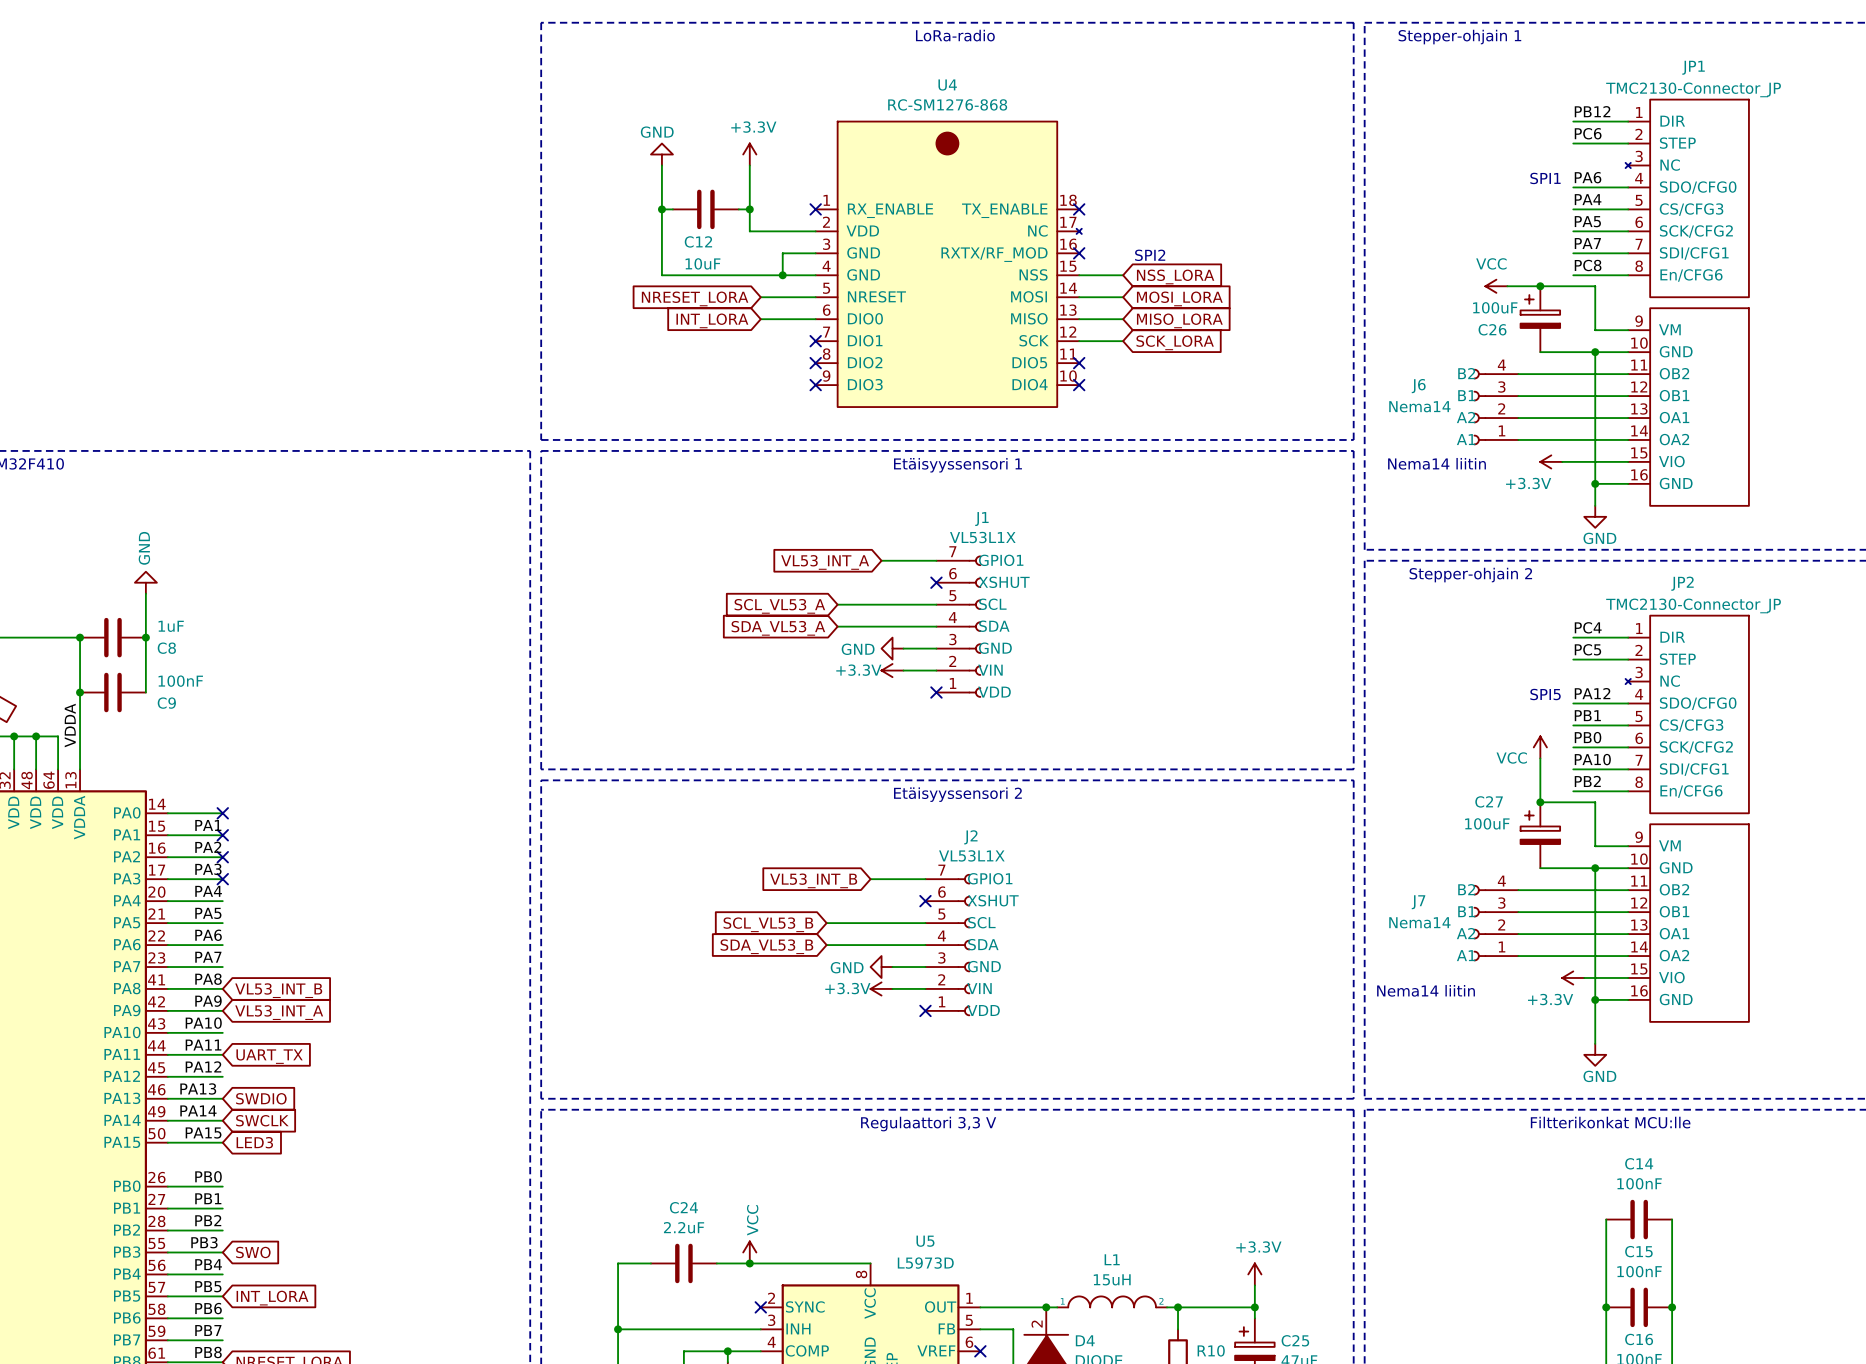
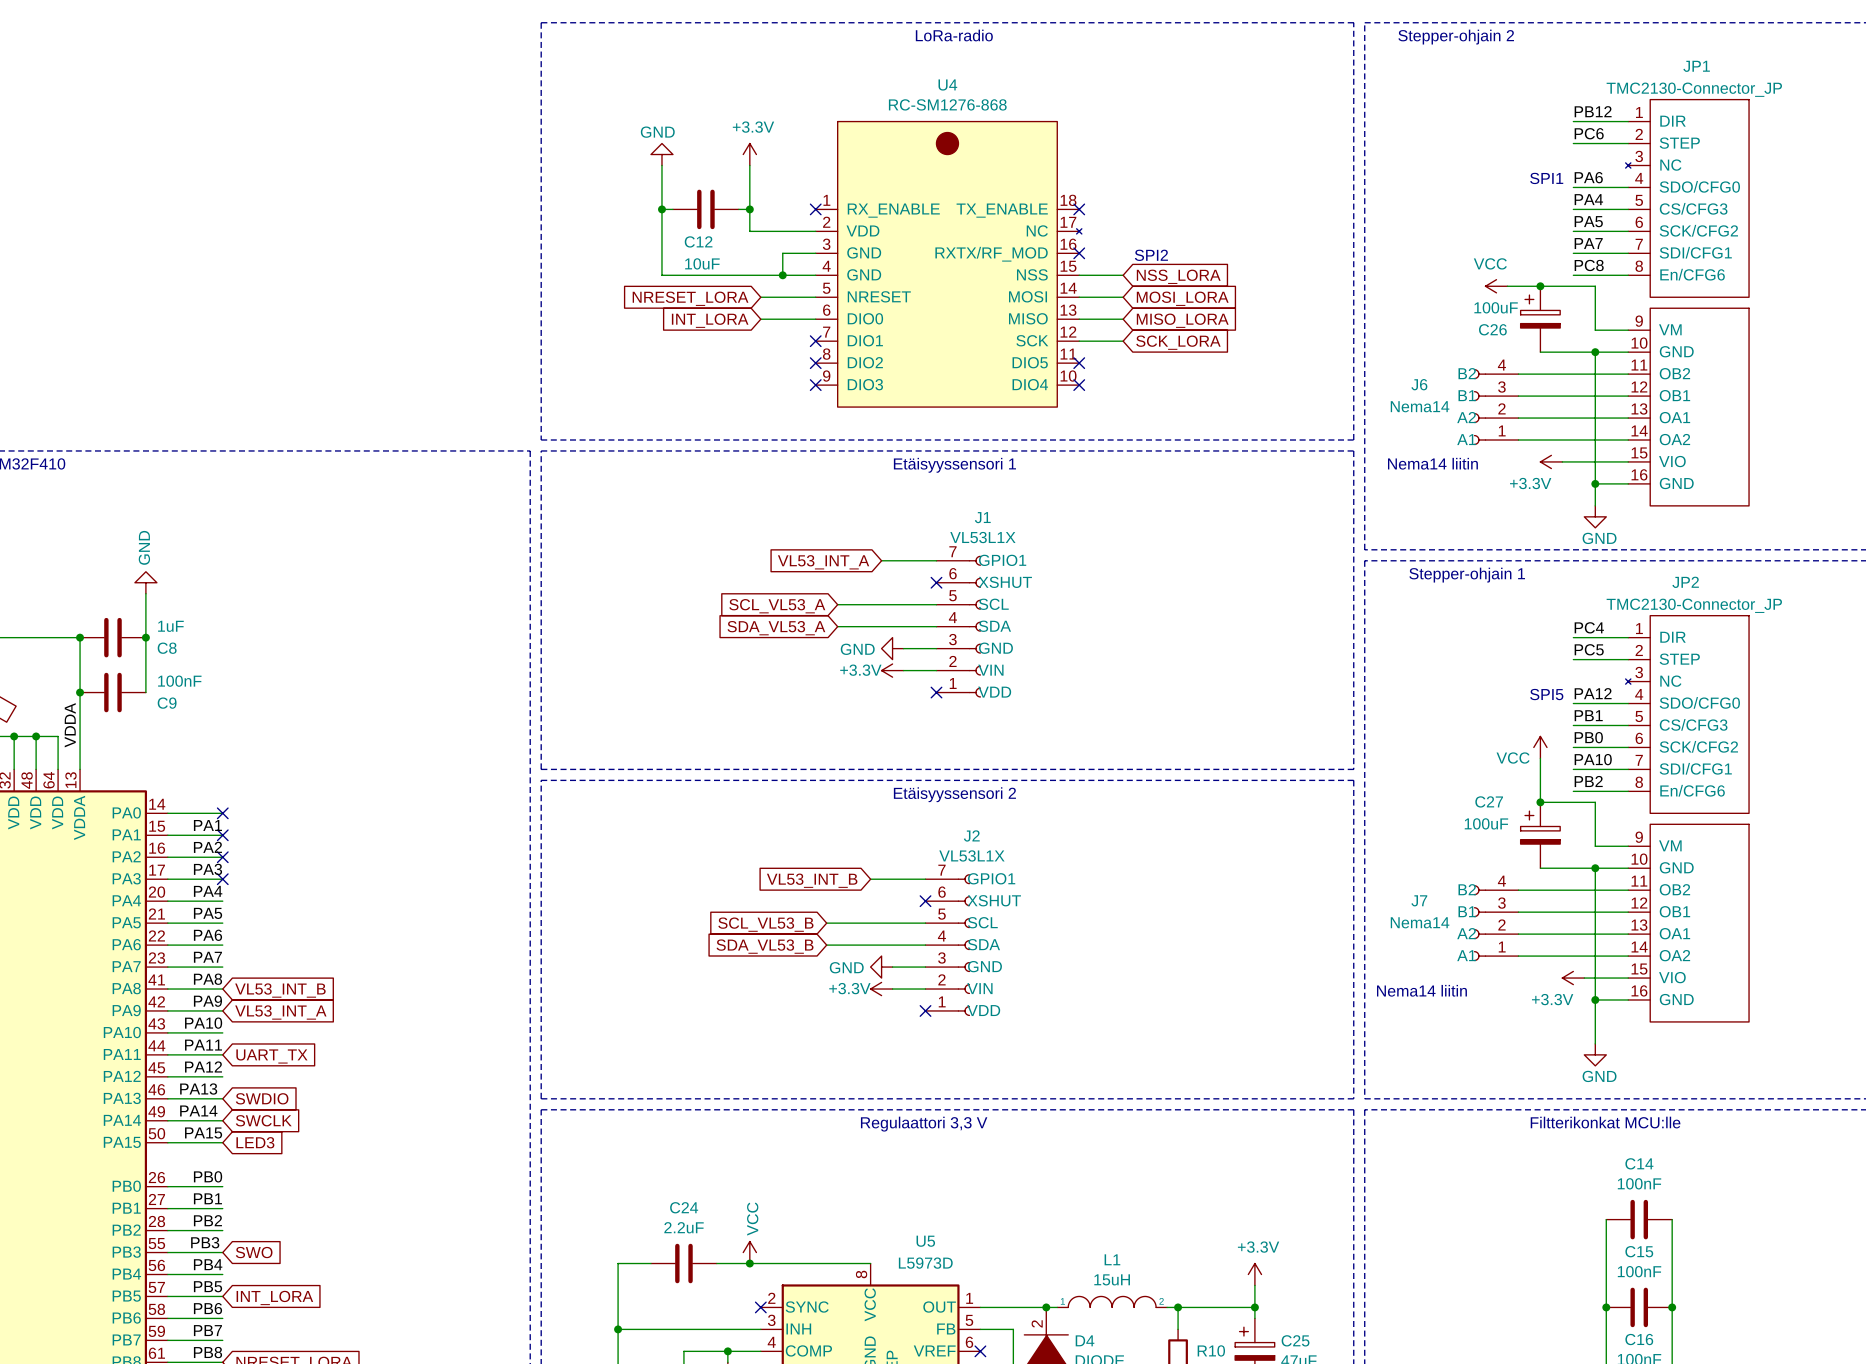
text: Stepper-ohjain 1 (1459, 37) -> Stepper-ohjain 2 (1456, 37)
text: Stepper-ohjain 2 (1470, 575) -> Stepper-ohjain 1 (1467, 575)

